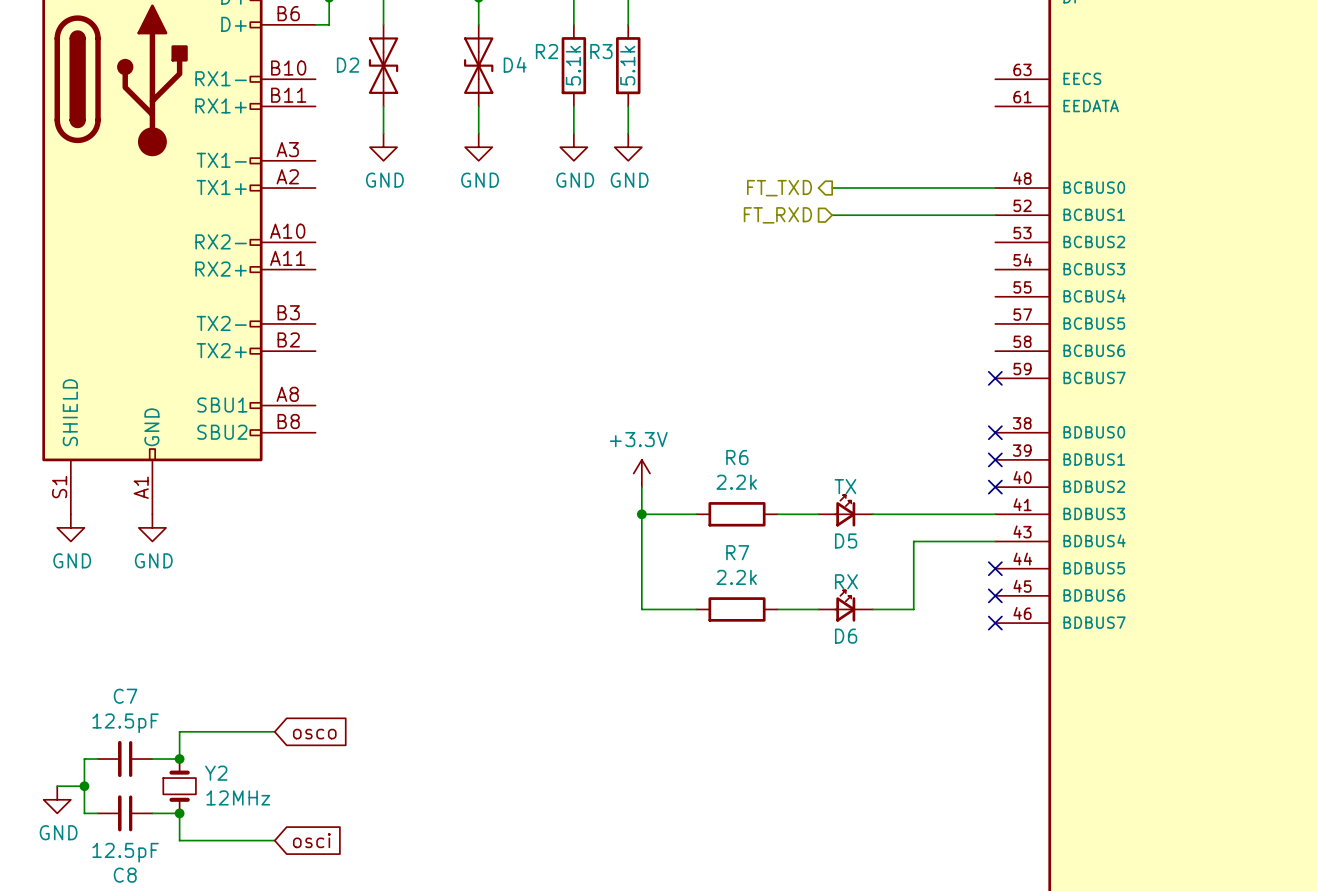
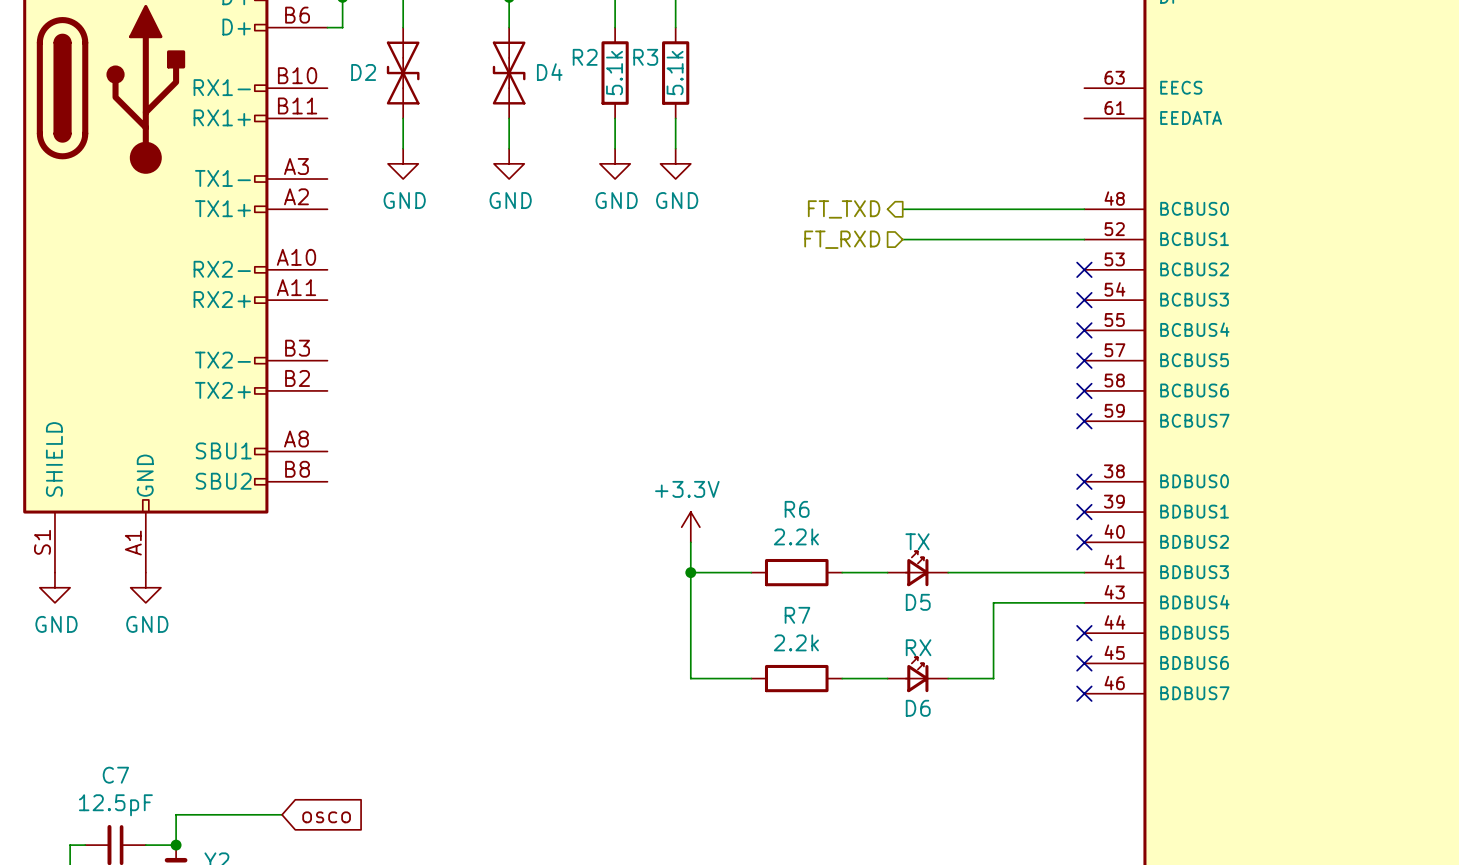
no-connect mark: none -> (1084, 269)
no-connect mark: none -> (1084, 300)
no-connect mark: none -> (1084, 330)
no-connect mark: none -> (1084, 360)
no-connect mark: none -> (1084, 390)

